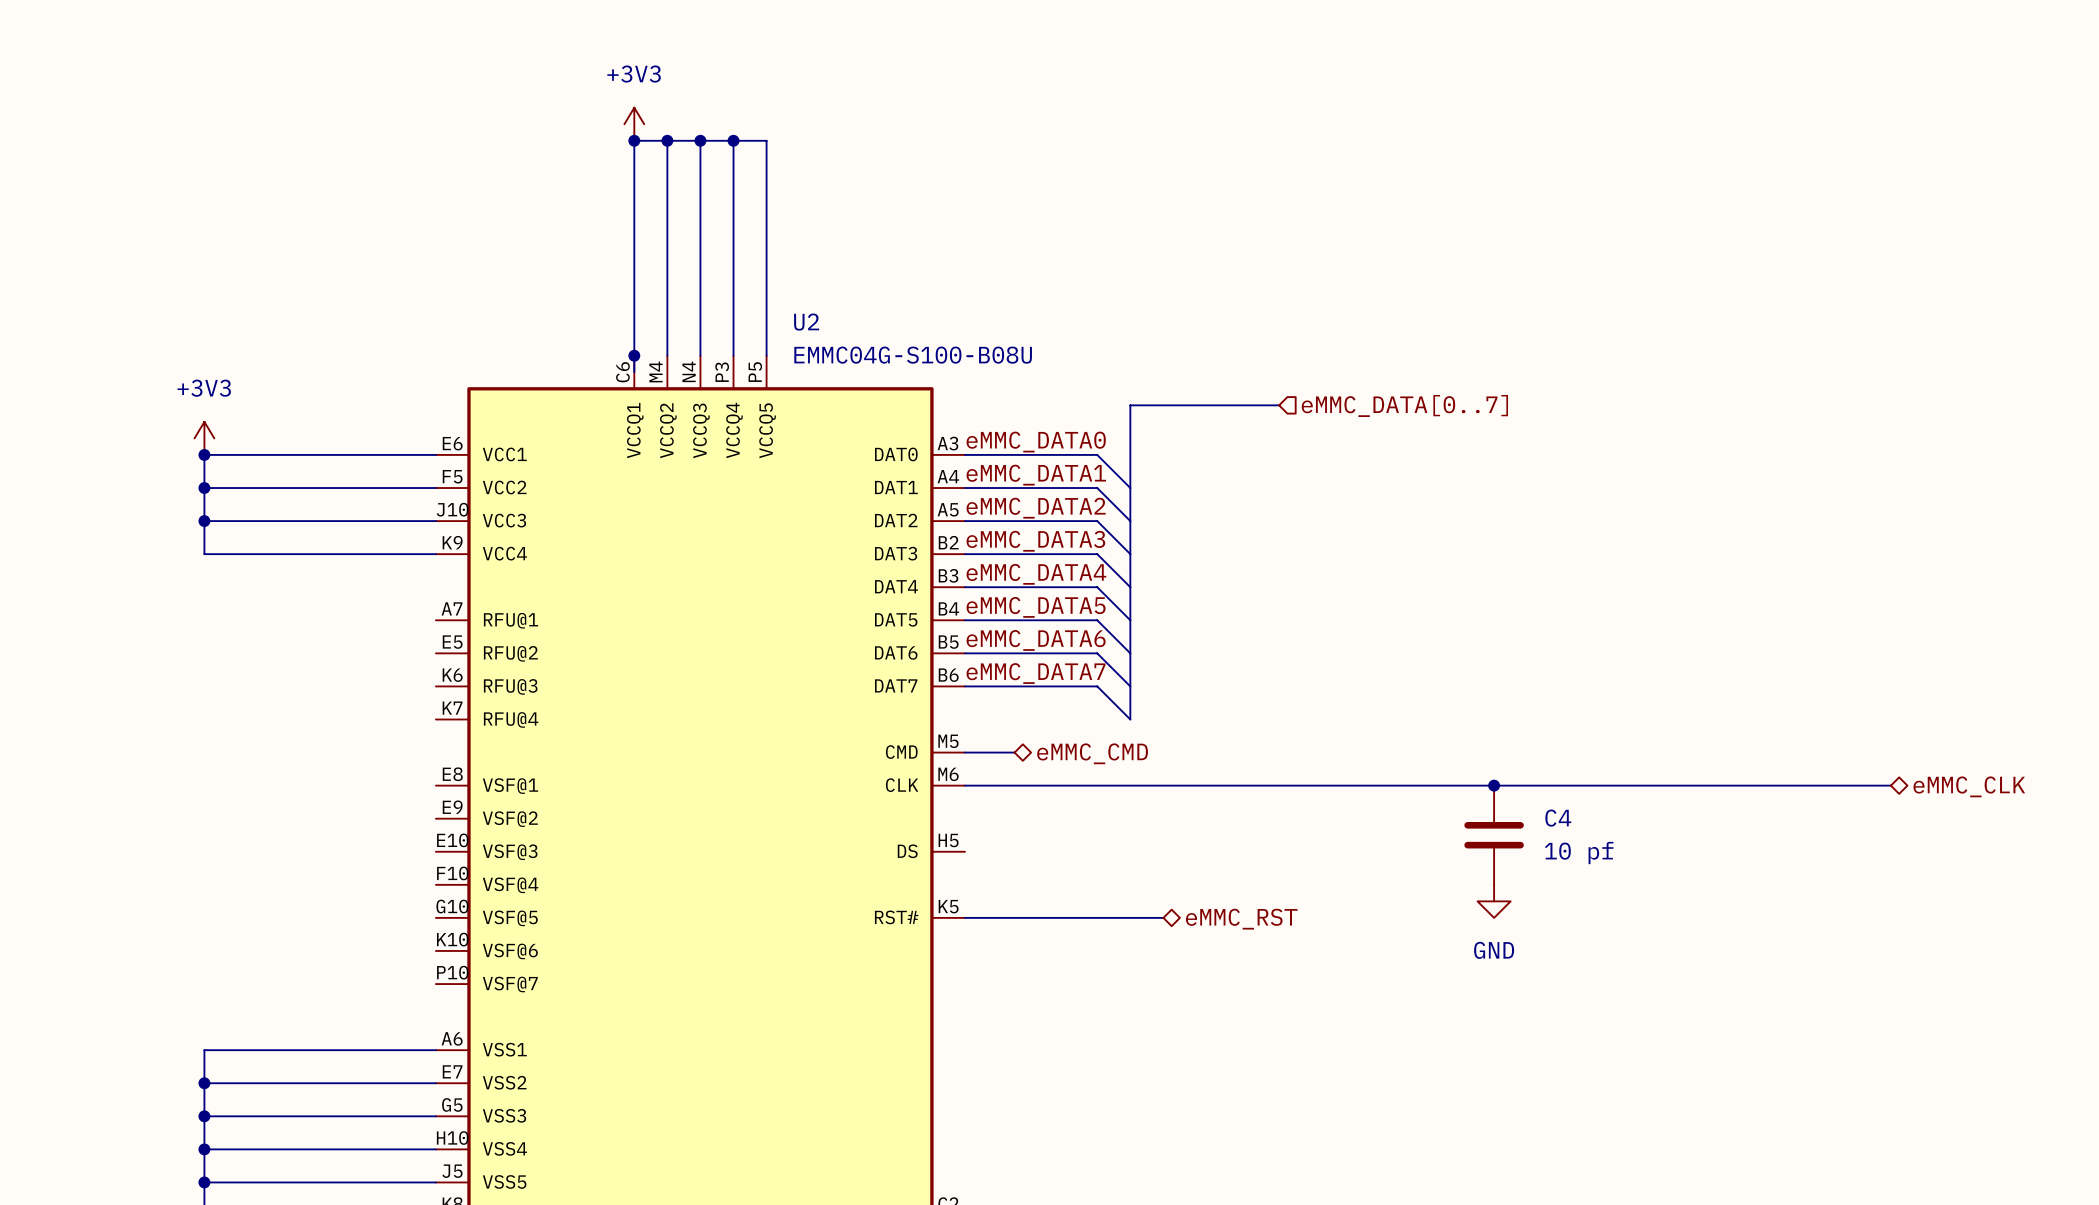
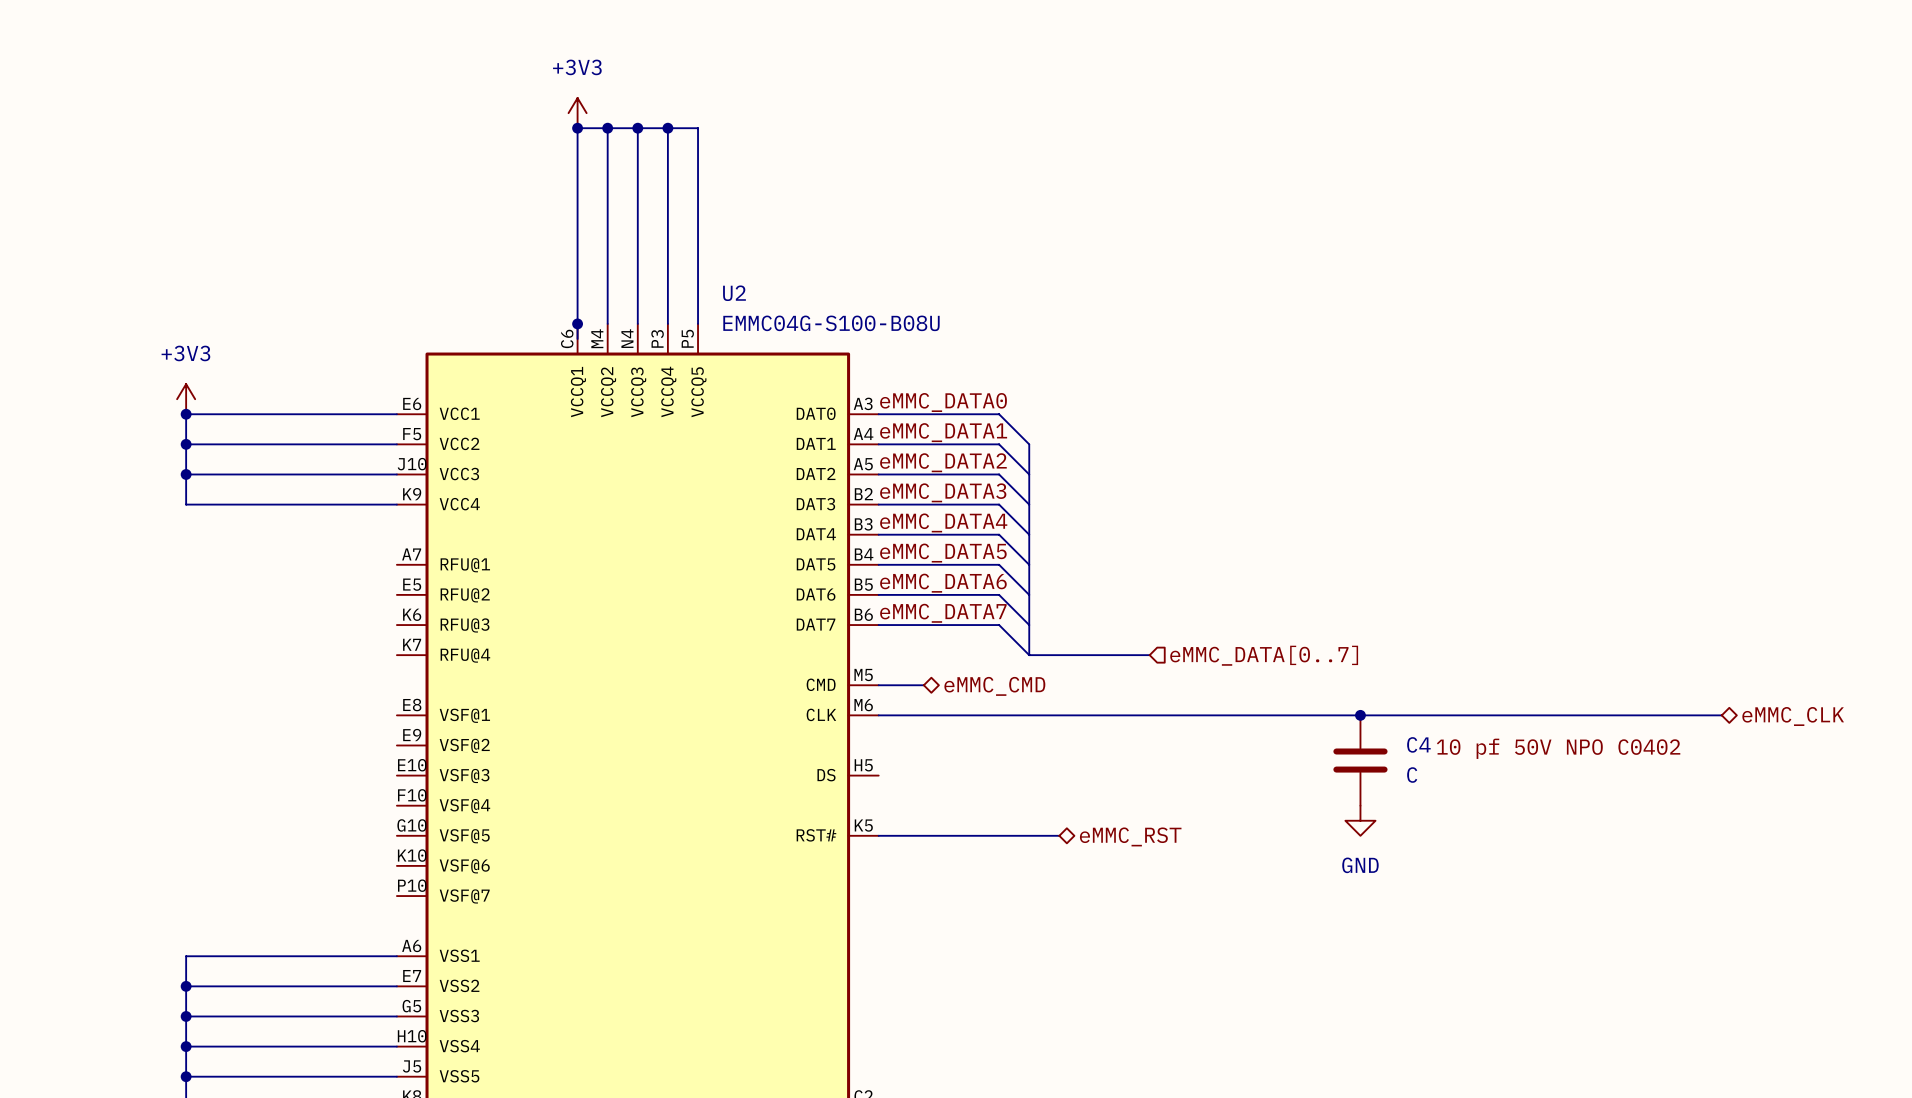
bus: (1279, 405) (1130, 405) (1130, 488) -> none
hierarchical label position: eMMC_DATA[0..7] (1404, 405) -> eMMC_DATA[0..7] (1264, 655)
bus: none -> (1029, 655) (1149, 655)
label: none -> 10 pf 50V NPO C0402 (1558, 748)
C4 value: 10 pf (1579, 853) -> C (1412, 775)

